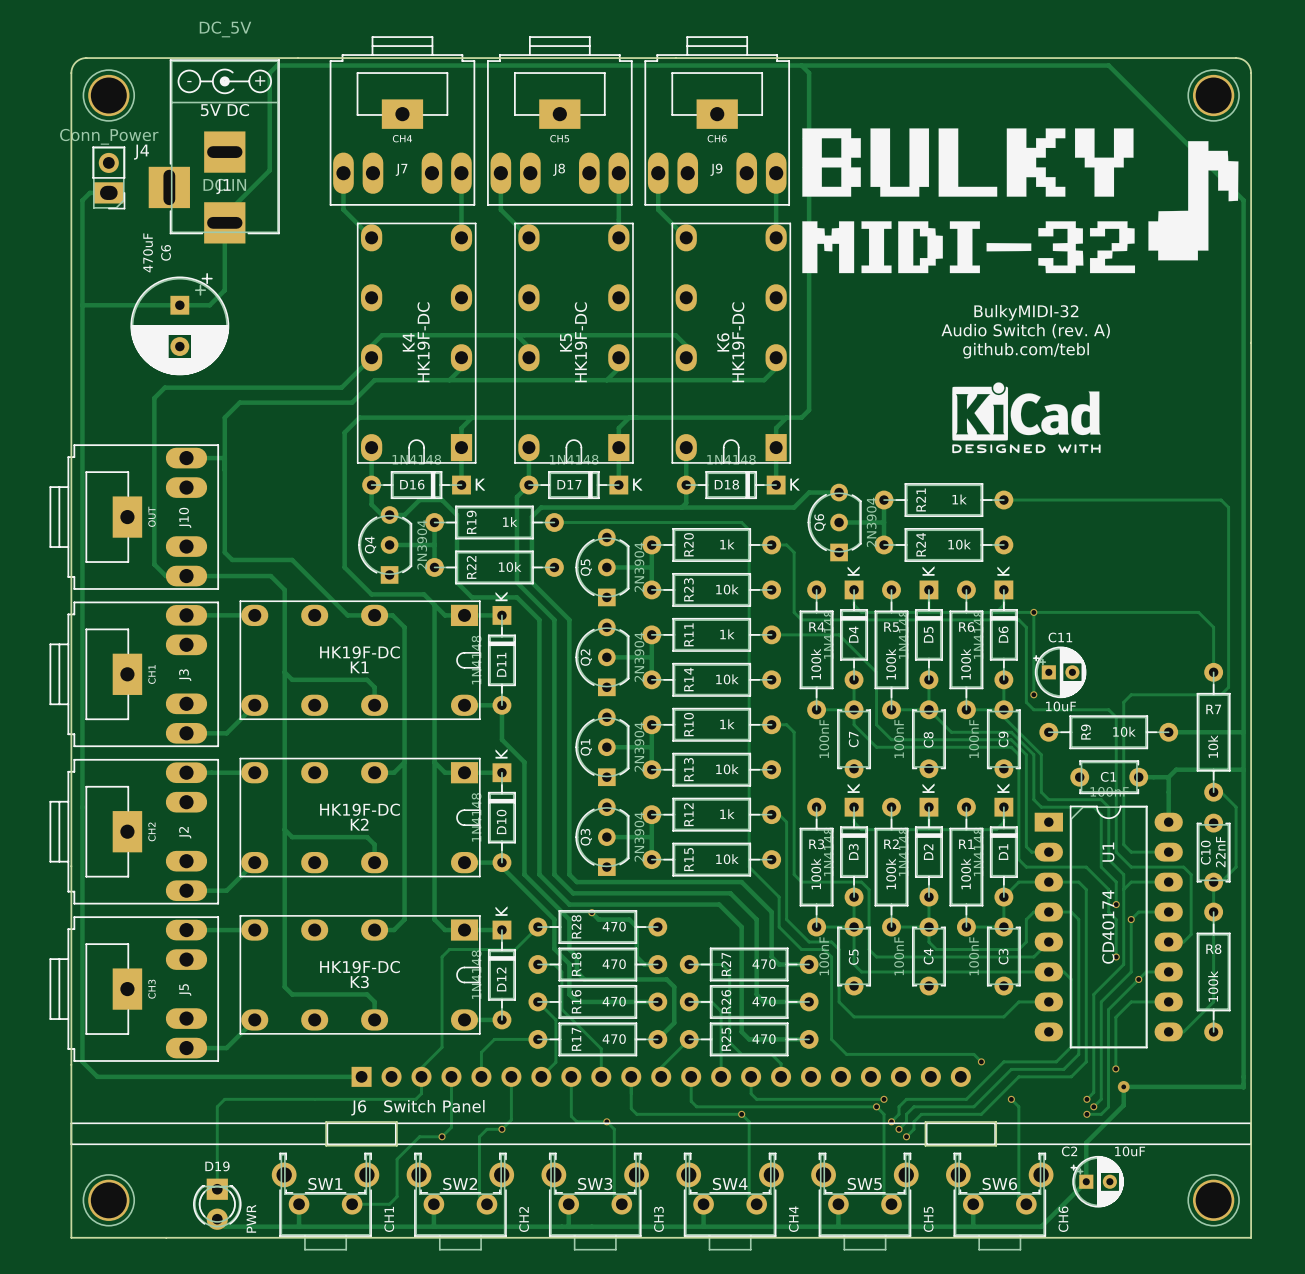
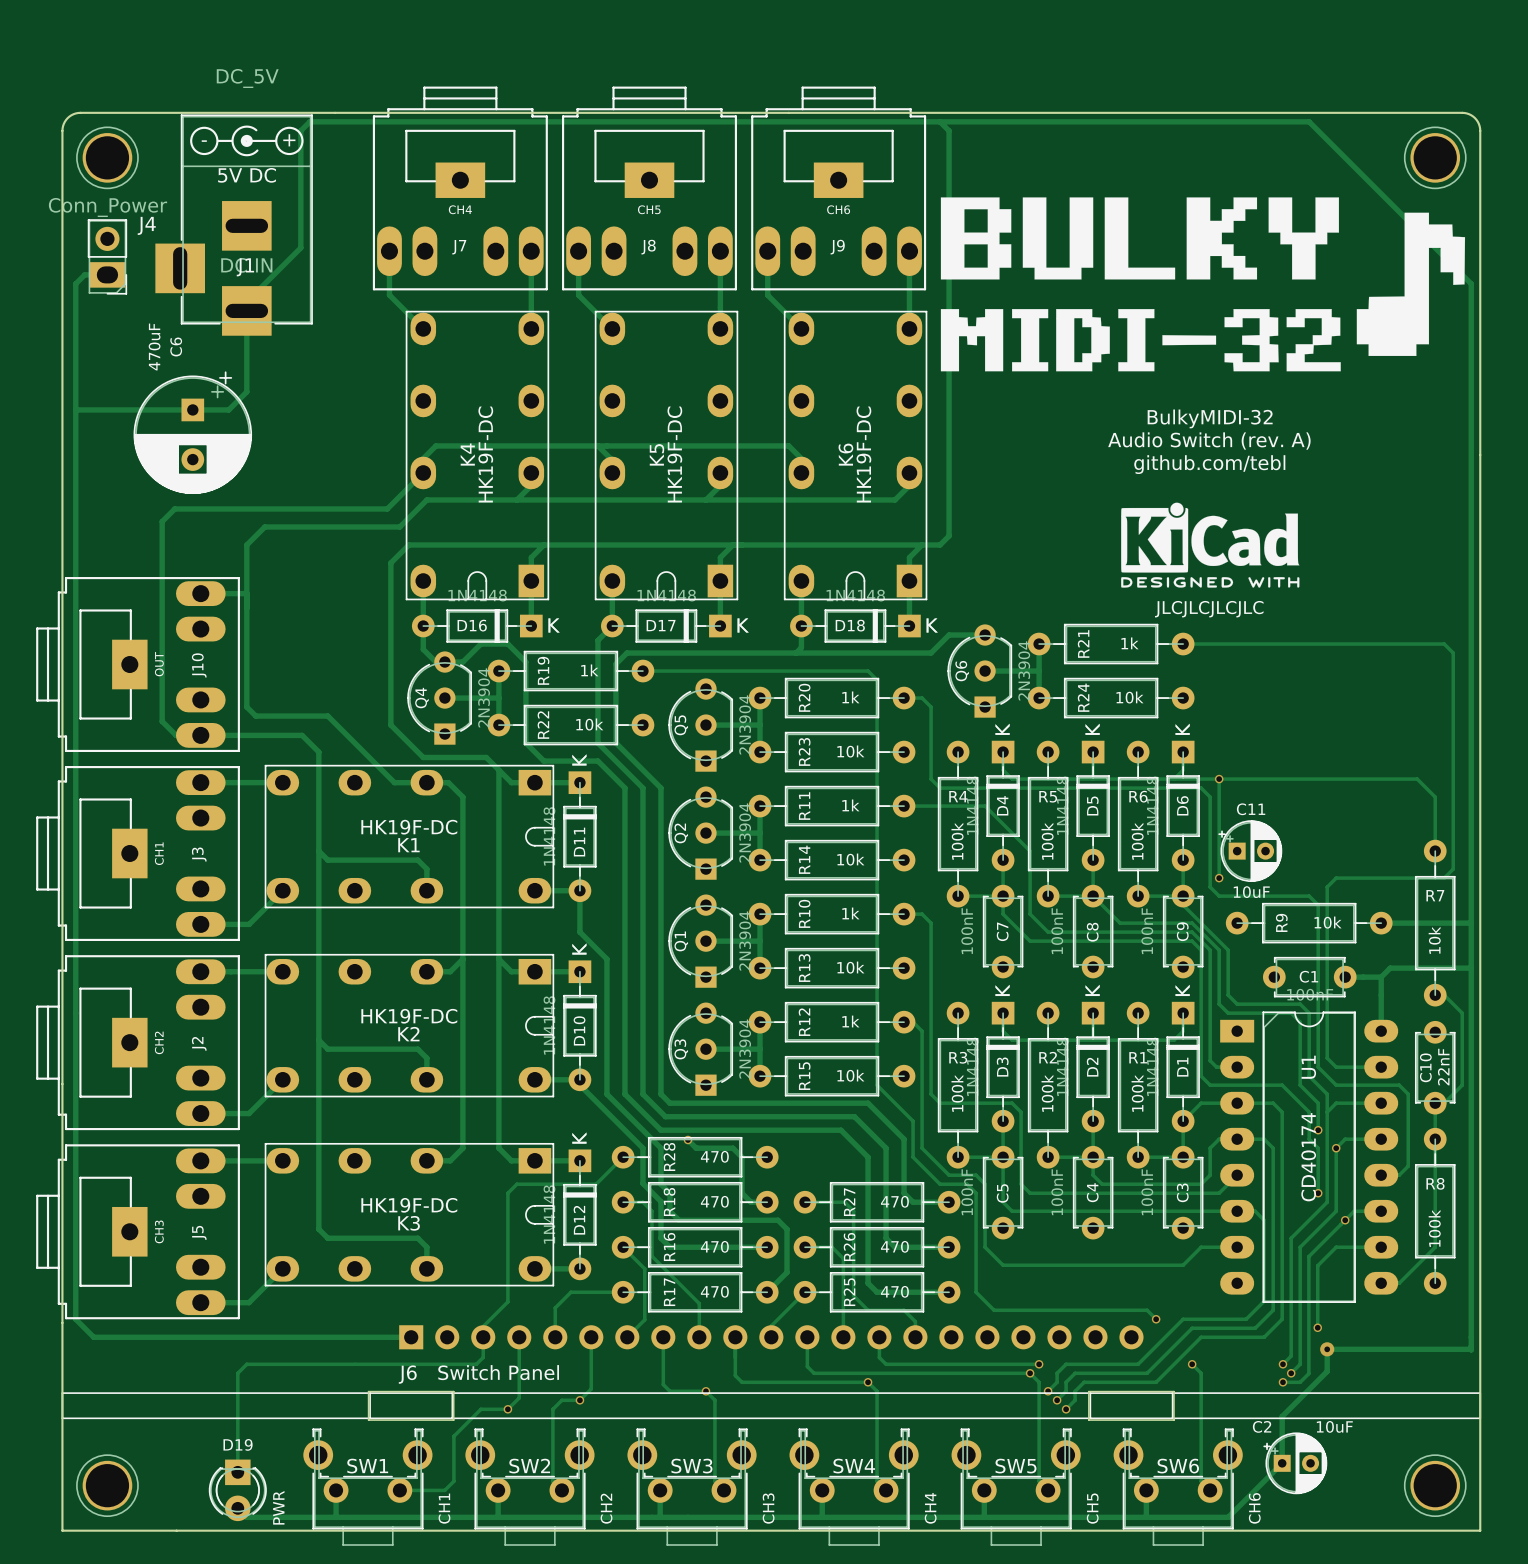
text: none -> JLCJLCJLCJLC (1209, 609)

